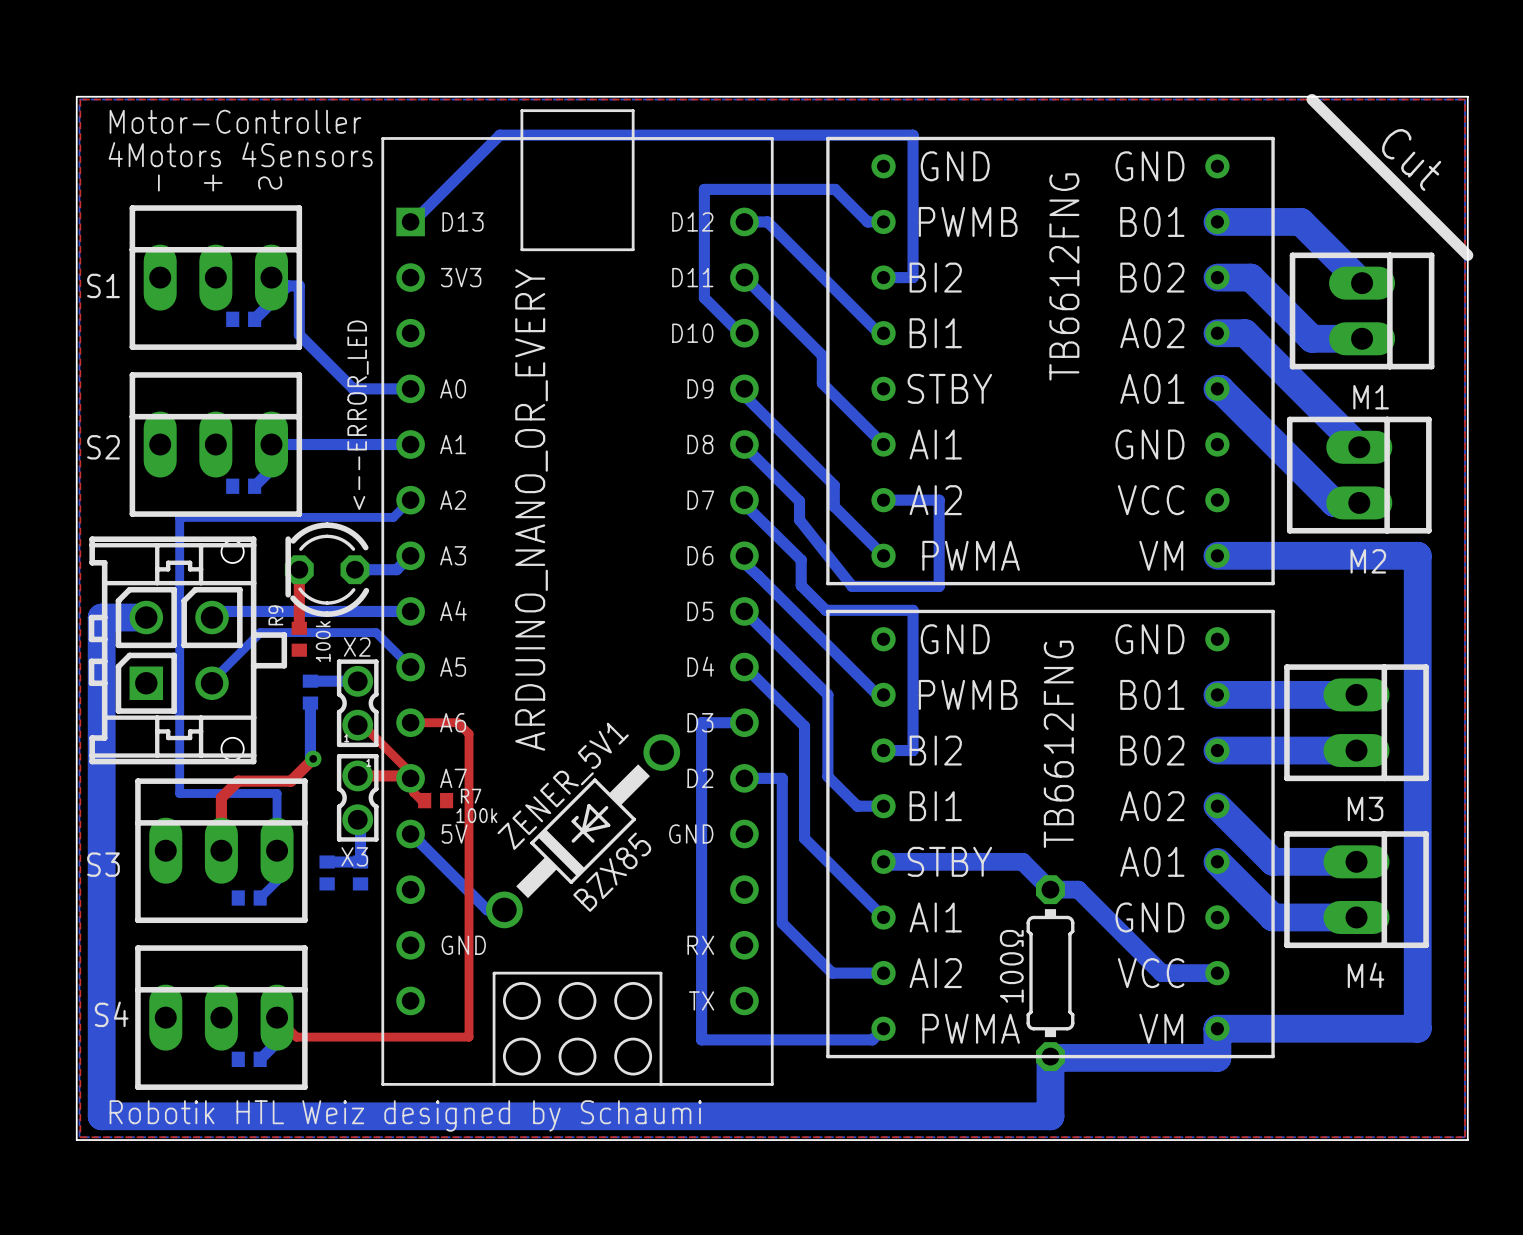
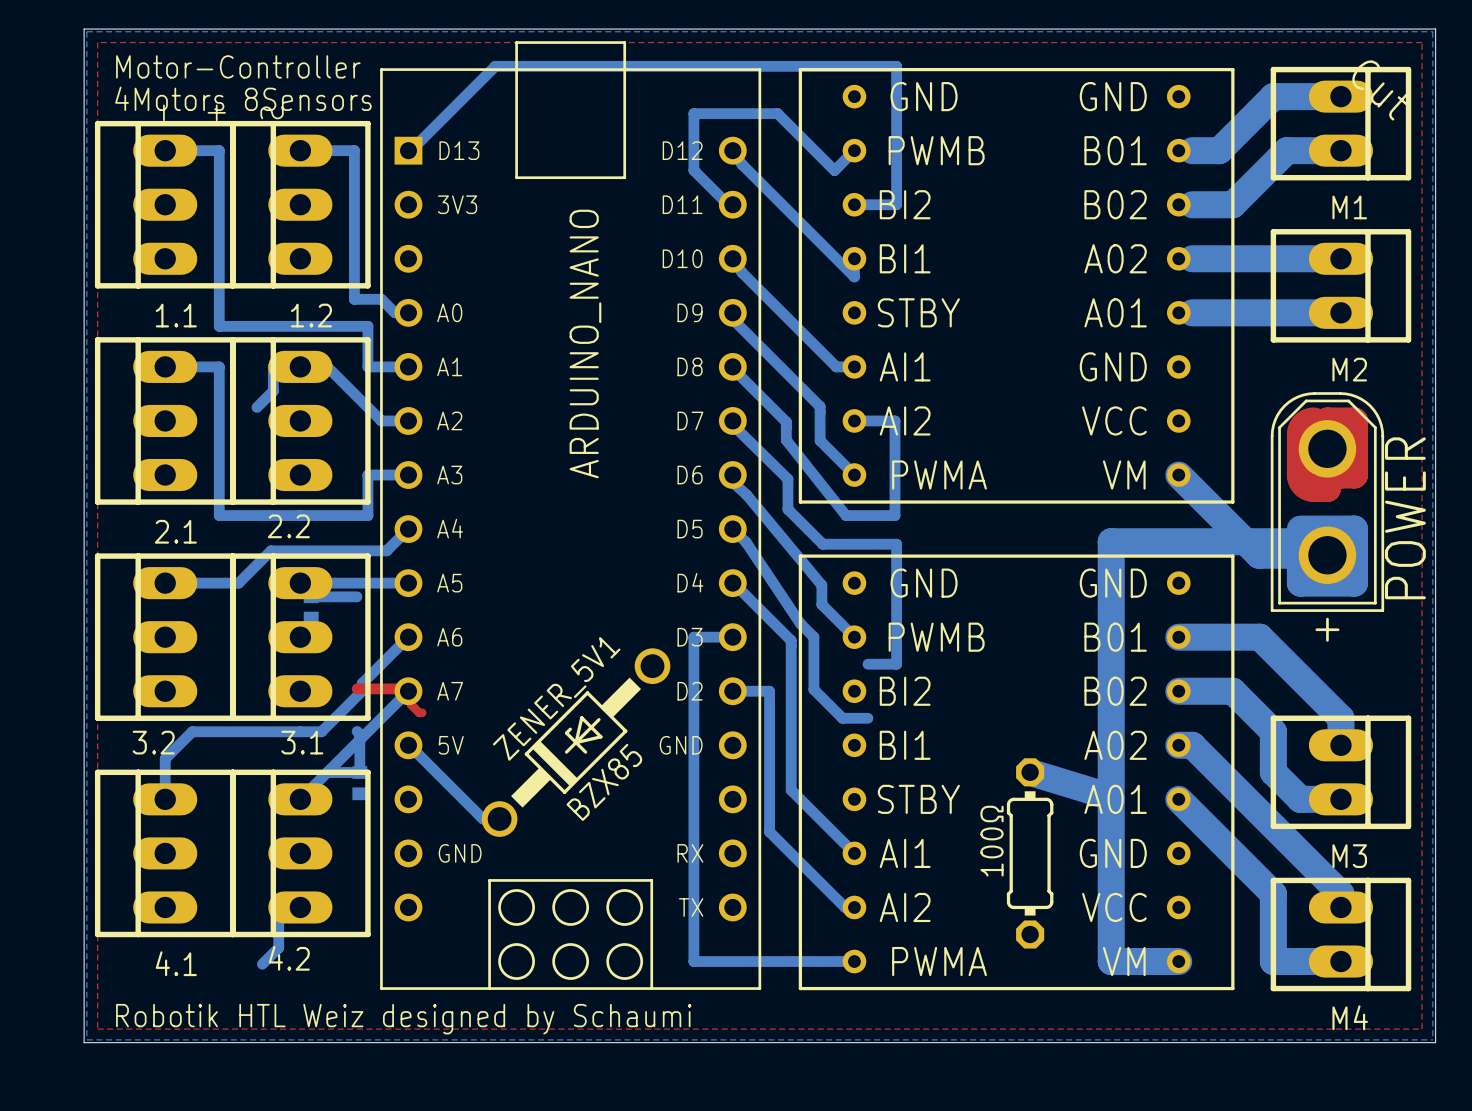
top zone outline: (80, 99) (80, 1137) (1465, 1137) (1465, 99) (80, 99) -> (97, 42) (97, 1029) (1422, 1029) (1422, 42) (97, 42)
line: (1311, 99) (1467, 255) -> none
text position: Motor-Controller (235, 121) -> Motor-Controller (238, 66)
text: 4Motors 4Sensors (240, 154) -> 4Motors 8Sensors (243, 98)
bottom track: (704, 189) (835, 189) (867, 221) (883, 221) -> (693, 119) (693, 113) (777, 113) (834, 170) (854, 150)
bottom track: none -> (165, 150) (219, 150) (219, 326) (367, 326) (367, 366)
bottom track: (744, 221) (767, 221) (883, 337) (883, 333) -> (732, 150) (742, 164) (854, 276) (854, 258)
bottom track: (1245, 221) (1300, 221) (1362, 283) -> (1219, 150) (1273, 96) (1340, 96)
bottom track: (704, 242) (704, 297) (740, 334) -> (693, 170) (723, 200) (732, 204)
text: TB6612FNG (1064, 276) -> none
1.1: none -> (165, 204)
S1: (215, 277) -> none
1.2: none -> (300, 204)
bottom track: (744, 277) (822, 355) (822, 383) (883, 444) -> none
bottom track: (1250, 277) (1311, 338) (1362, 338) -> (1224, 204) (1232, 204) (1286, 150) (1340, 150)
M1 position: (1362, 310) -> (1340, 123)
part: (243, 319) -> none
bottom track: (254, 319) (288, 285) (299, 285) (299, 334) (353, 388) (396, 388) -> (300, 150) (354, 150) (354, 299) (381, 299) (394, 312)
bottom track: none -> (732, 258) (742, 272) (836, 366) (854, 366)
bottom track: (1245, 333) (1359, 447) -> (1219, 258) (1340, 258)
part position: (1050, 361) -> (1016, 285)
bottom track: (1220, 388) (1334, 502) (1359, 502) -> (1195, 312) (1340, 312)
S2: (215, 444) -> none
bottom track: (327, 444) (368, 444) -> (327, 366) (381, 420) (408, 420)
M2 position: (1359, 475) -> (1340, 285)
part: (243, 486) -> none
2.1: none -> (165, 420)
2.2: none -> (300, 420)
bottom track: (410, 500) (393, 517) (179, 517) (179, 793) (277, 793) (277, 881) (260, 898) -> none
bottom track: (911, 500) (939, 500) (939, 586) (852, 586) -> (894, 420) (894, 515) (846, 515) (837, 504)
top track: none -> (1313, 420) (1305, 423) (1300, 432) (1300, 476) (1307, 486) (1327, 488) (1329, 481) (1334, 476) (1354, 475) (1354, 420) (1327, 420) (1327, 448)
bottom track: (834, 506) (883, 555) -> (820, 427) (820, 440) (854, 475)
ARDUINO_NANO_OR_EVERY name: ARDUINO_NANO_OR_EVERY (531, 509) -> ARDUINO_NANO (585, 344)
line: (288, 539) (288, 594) -> none
bottom track: (410, 555) (396, 569) (354, 569) -> (408, 475) (367, 475) (367, 515) (219, 515) (219, 366) (165, 366)
bottom track: none -> (1178, 475) (1259, 555) (1327, 555) (1313, 541) (1111, 541) (1111, 961) (1178, 961)
bottom track: (1217, 555) (1417, 555) (1417, 1028) (1217, 1028) (1217, 1057) (1050, 1057) -> none
top track: (299, 569) (299, 628) -> none
<--ERROR_LED: (327, 569) -> none
bottom track: (758, 576) (877, 694) (883, 694) -> (746, 494) (821, 585) (821, 604) (854, 637)
bottom track: (801, 585) (825, 610) (913, 610) (913, 627) -> (787, 503) (787, 509) (822, 544) (896, 544)
POWER: none -> (1327, 516)
bottom track: (410, 611) (218, 611) (212, 617) -> (408, 529) (386, 550) (270, 550) (238, 583) (165, 583)
bottom track: none -> (1300, 529) (1354, 529) (1354, 583) (1300, 583) (1300, 555)
bottom track: (146, 617) (101, 617) (101, 1116) (1050, 1116) (1050, 1056) -> none
bottom track: (758, 625) (827, 694) (827, 722) -> (746, 542) (800, 623) (813, 637)
R9: 100k (299, 639) -> none
part: (187, 650) -> none
bottom track: (410, 667) (376, 632) (260, 632) (212, 680) (212, 683) -> (408, 583) (300, 583)
bottom track: (1217, 694) (1356, 694) -> none
bottom track: (310, 703) (310, 756) (313, 758) -> none
X2: (357, 703) -> none
3.2: none -> (165, 637)
3.1: none -> (300, 637)
bottom track: none -> (408, 637) (362, 683) (362, 691) (321, 731) (192, 731) (165, 758) (165, 799)
top track: (410, 722) (457, 722) (469, 733) (469, 1037) (296, 1037) (277, 1017) -> none
bottom track: (704, 722) (701, 722) (701, 1039) (872, 1039) (883, 1028) -> (693, 637) (693, 961) (854, 961)
bottom track: none -> (1178, 637) (1259, 637) (1340, 718) (1340, 745)
M3 position: (1356, 722) -> (1340, 772)
top track: (357, 725) (362, 725) (410, 772) (410, 778) (413, 781) -> none
text: TB6612FNG (1058, 744) -> none
bottom track: (1217, 750) (1356, 750) -> none
top track: (313, 758) (290, 781) (238, 781) (221, 797) (221, 850) -> none
via: (313, 758) -> none
bottom track: none -> (408, 691) (300, 799)
bottom track: none -> (1178, 691) (1232, 691) (1273, 731) (1273, 772) (1300, 799) (1340, 799)
X3: (357, 797) -> none
R7: 100k (435, 800) -> none
bottom track: (1217, 806) (1273, 861) (1356, 861) -> none
part position: (1050, 834) -> (1016, 772)
bottom track: none -> (1178, 745) (1192, 745) (1340, 893) (1340, 907)
bottom track: (804, 838) (883, 917) -> (791, 749) (791, 790) (854, 853)
S3: (221, 850) -> none
bottom track: (883, 861) (1022, 861) (1050, 889) (1078, 889) (1161, 973) (1217, 973) -> none
bottom track: none -> (1030, 772) (1107, 796) (1111, 799)
bottom track: (1217, 861) (1273, 917) (1356, 917) -> none
part: (327, 872) -> none
bottom track: none -> (1178, 799) (1273, 893) (1273, 961) (1340, 961)
M4 position: (1356, 889) -> (1340, 934)
part: (249, 898) -> none
4.1: none -> (165, 853)
4.2: none -> (300, 853)
100Ω name position: 100Ω (1011, 966) -> 100Ω (992, 841)
bottom track: (832, 973) (883, 973) -> (818, 880) (845, 907) (854, 907)
100Ω position: (1050, 973) -> (1030, 853)
S4: (221, 1017) -> none
part: (249, 1059) -> none

